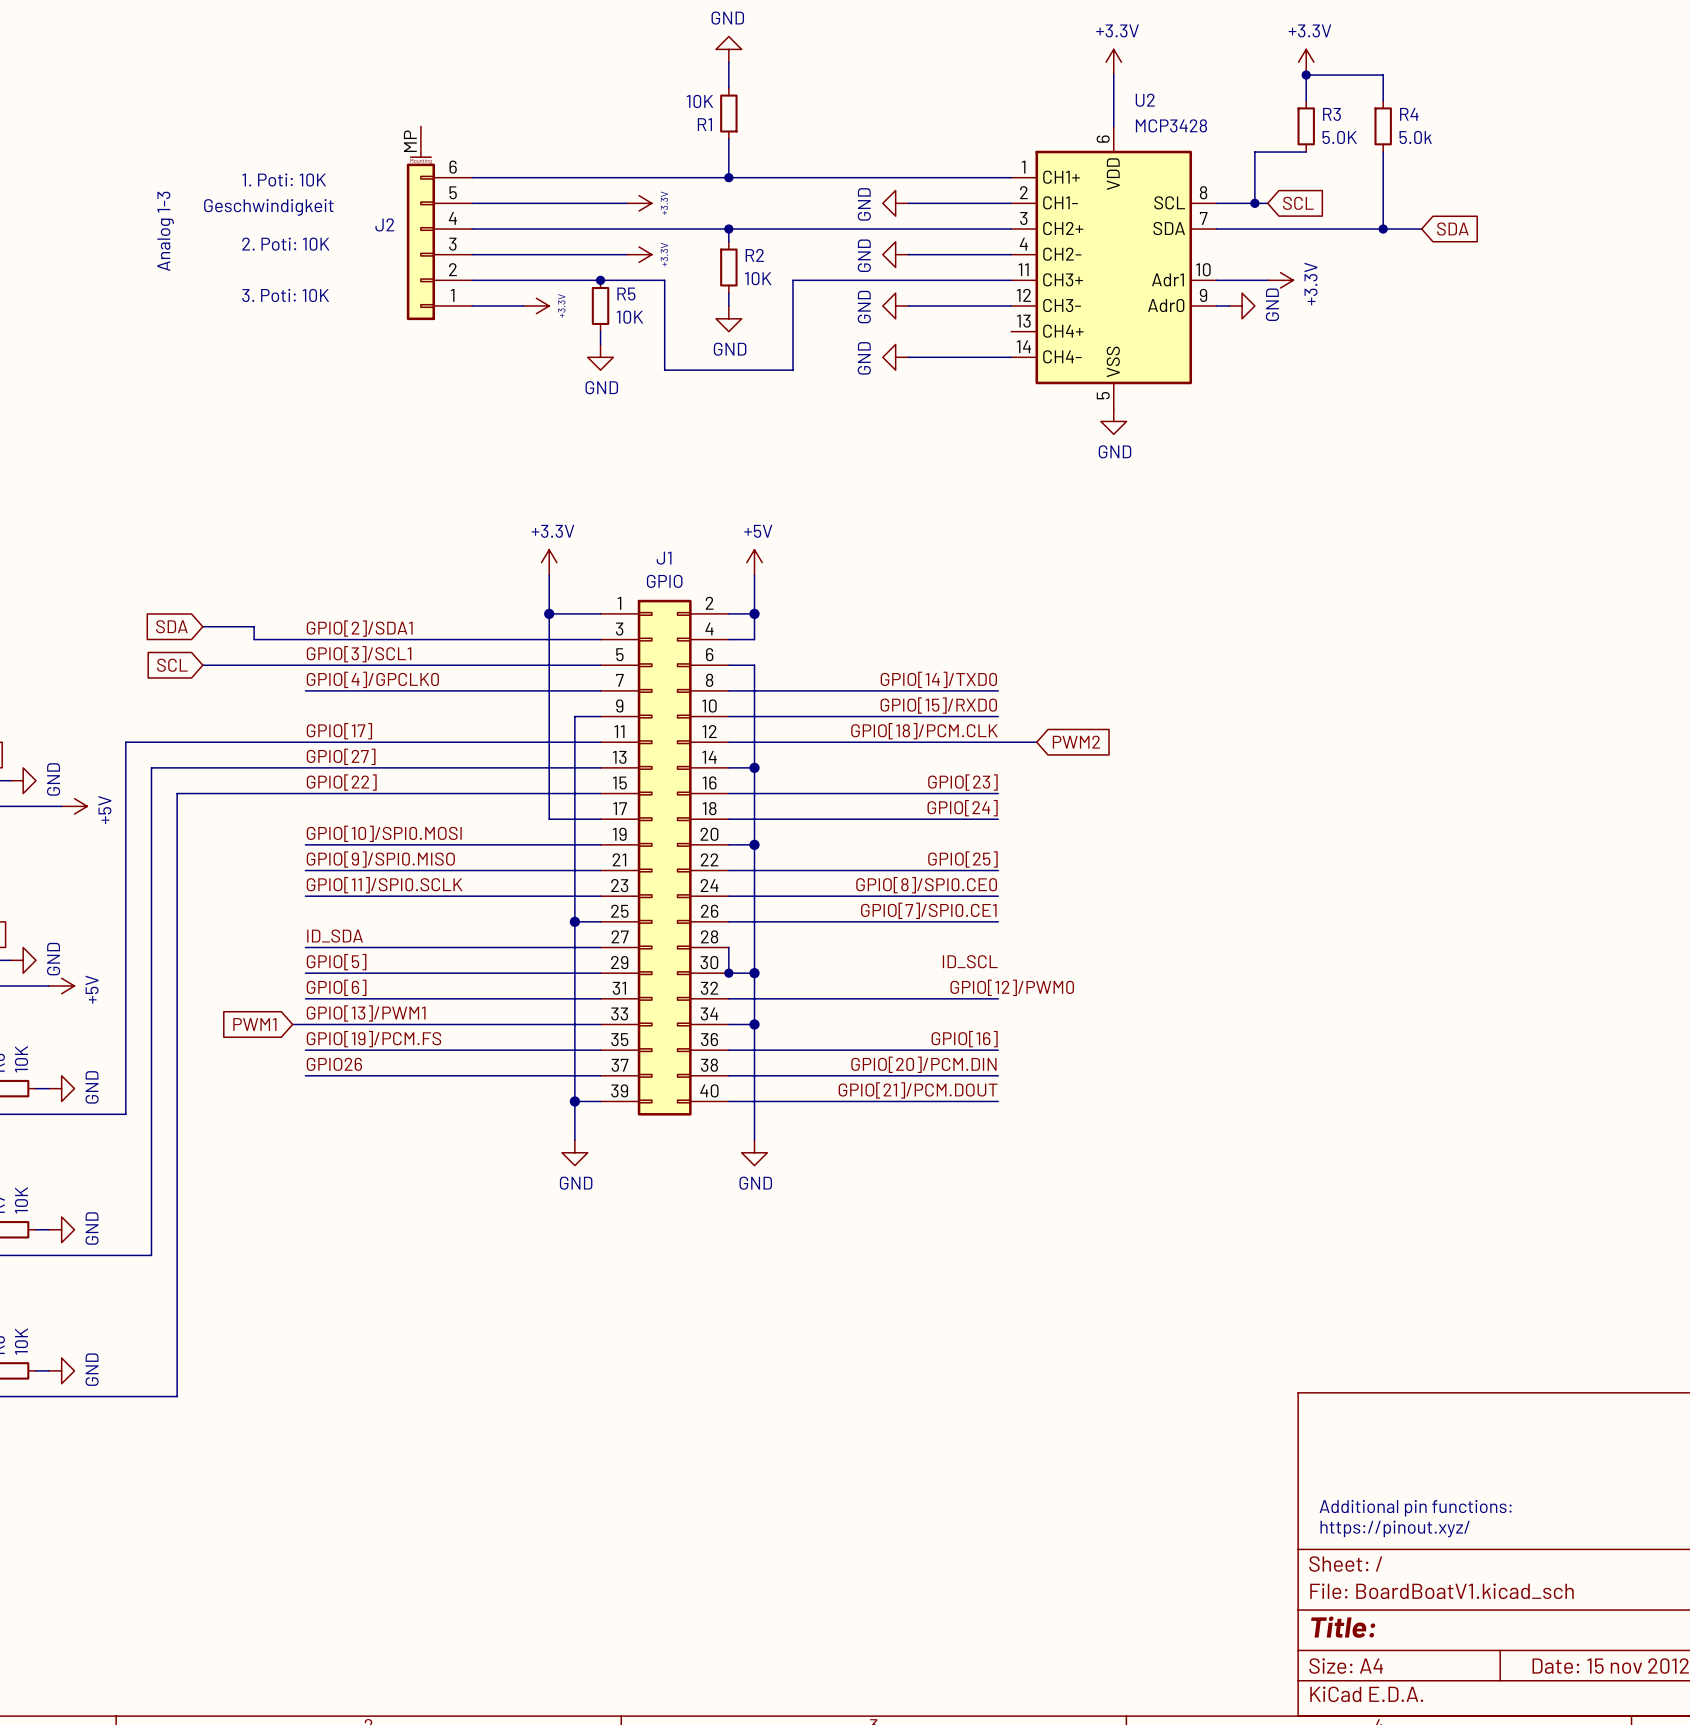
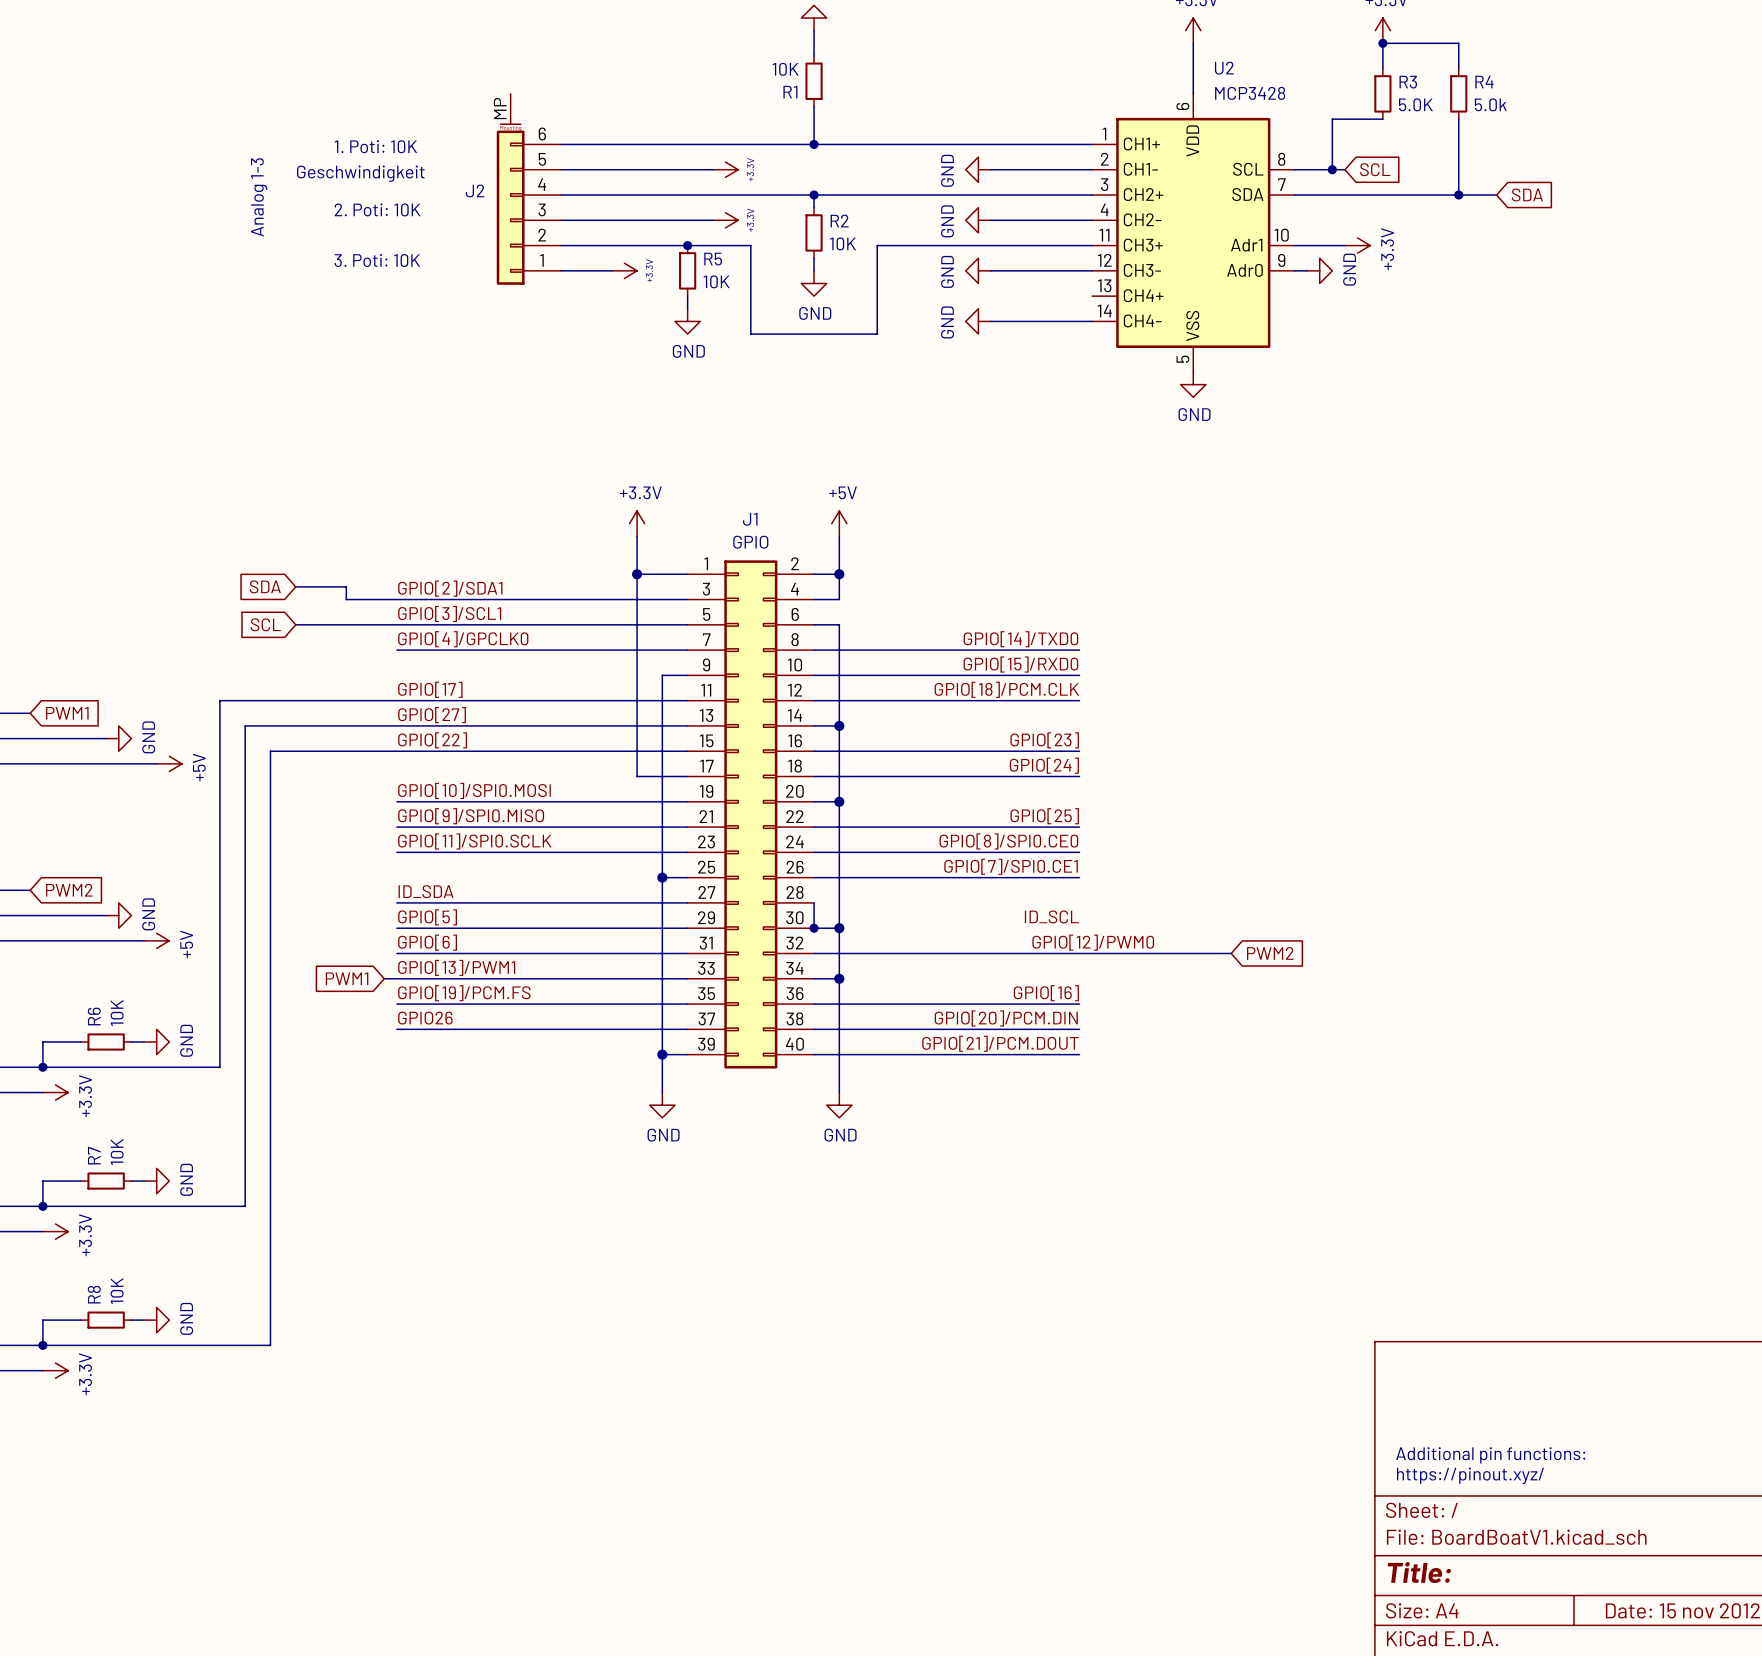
wire: (998, 742) (1036, 742) -> none
global label: PWM2 (1076, 742) -> none
wire: none -> (1079, 953) (1231, 953)
global label: none -> PWM2 (1270, 953)

